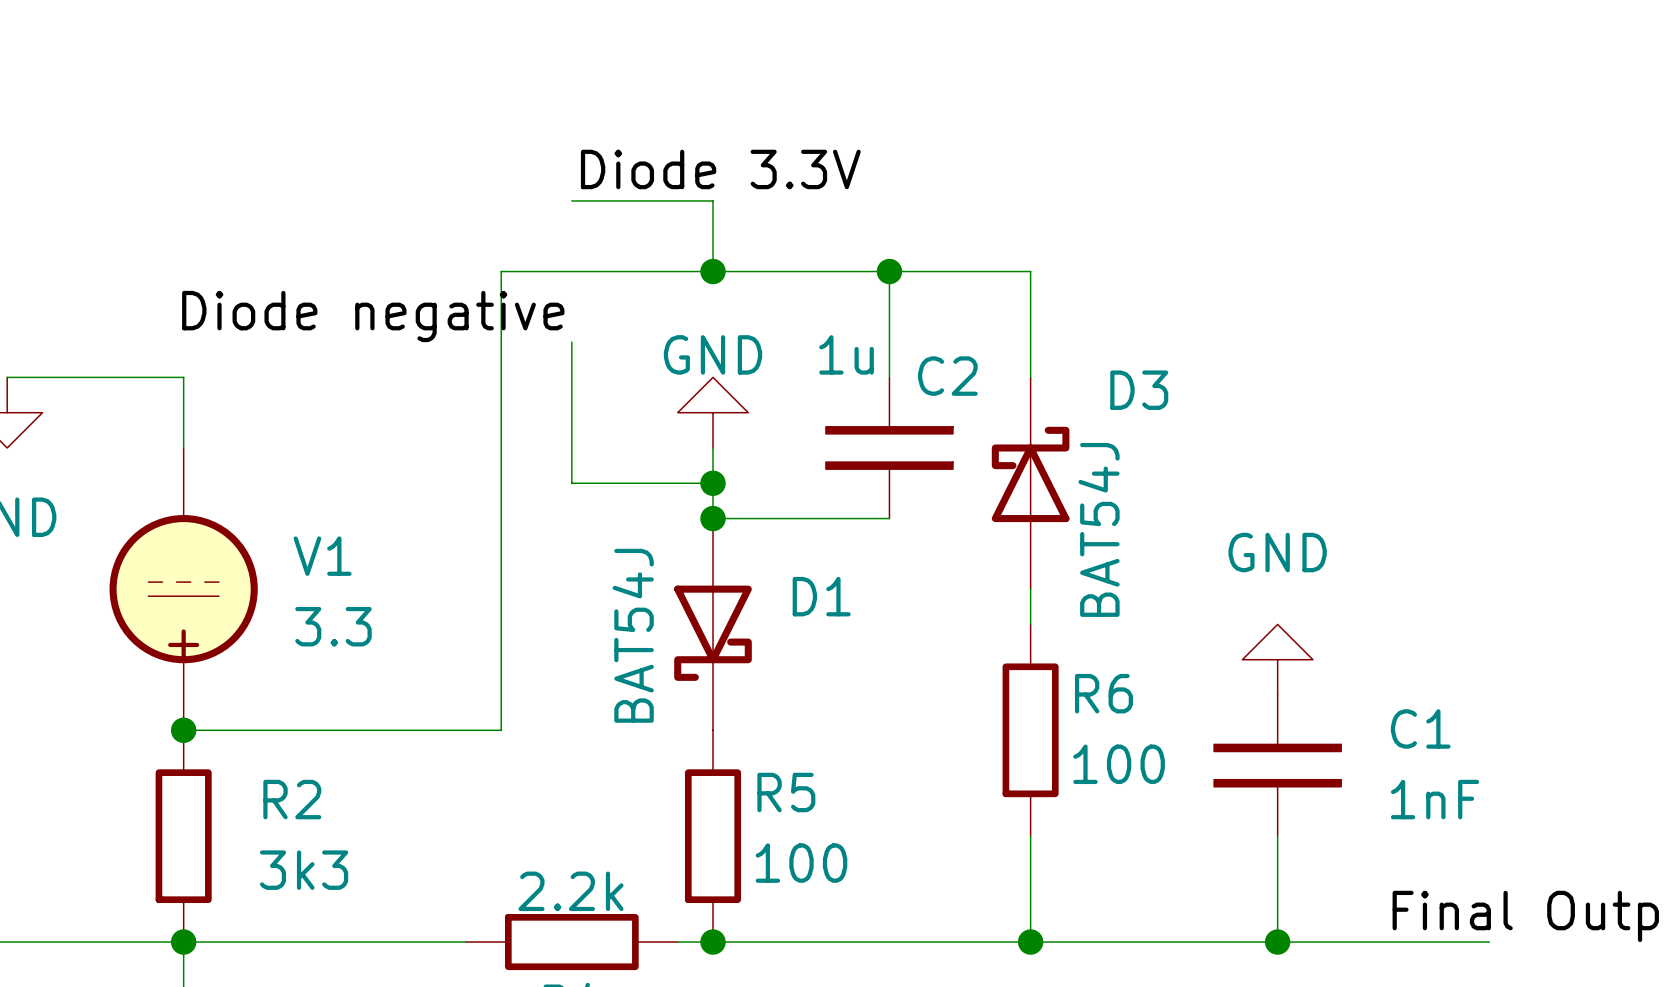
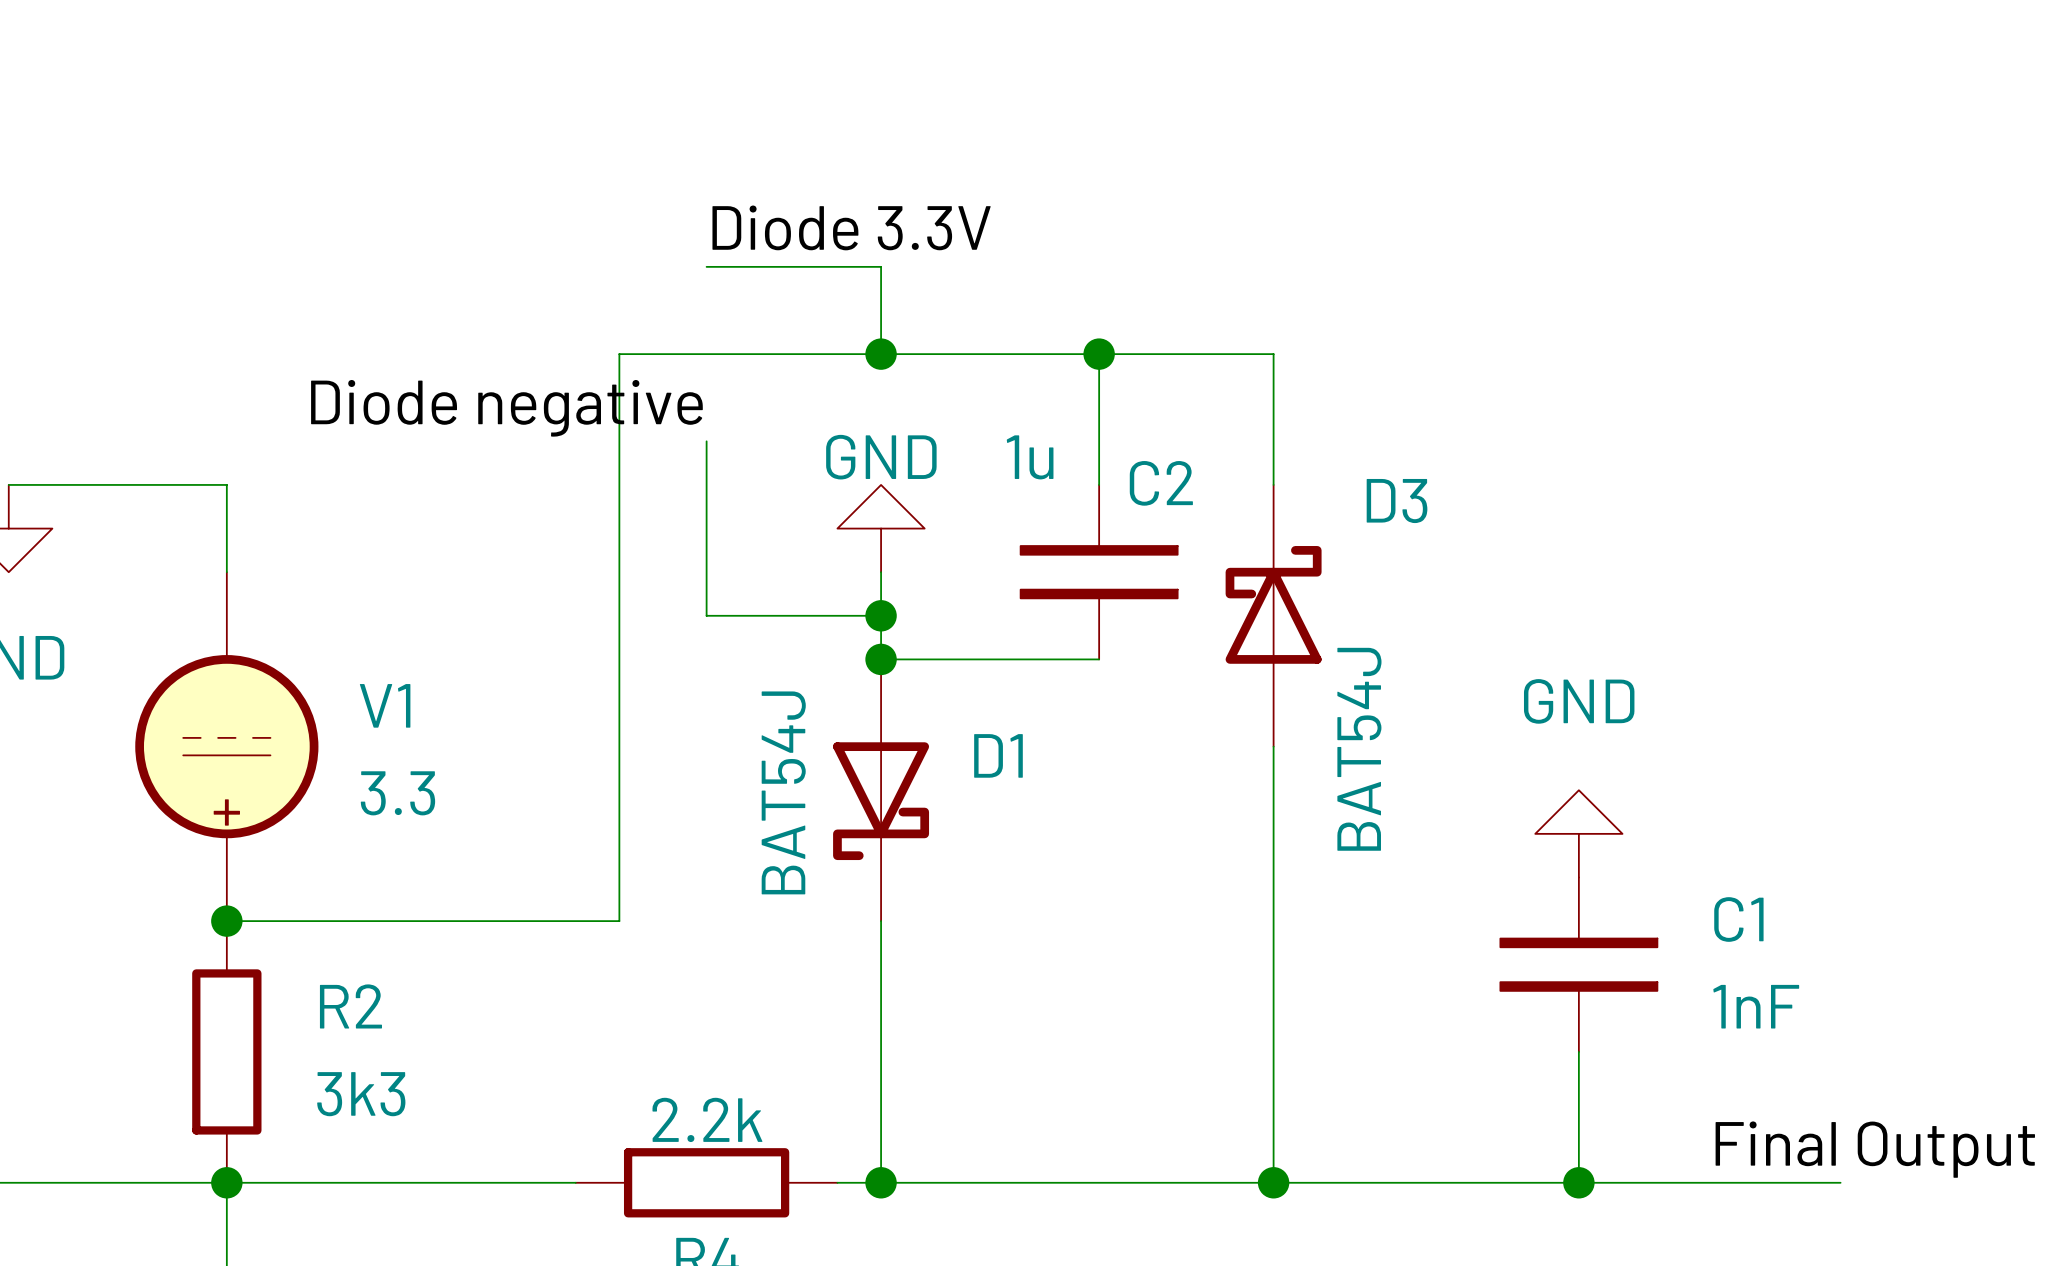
D3 value position: BAT54J (1099, 529) -> BAT54J (1359, 749)
wire: none -> (1273, 790) (1273, 1051)
wire: none -> (881, 921) (881, 1182)
R6: 100 (1030, 730) -> none
R5: 100 (713, 836) -> none

